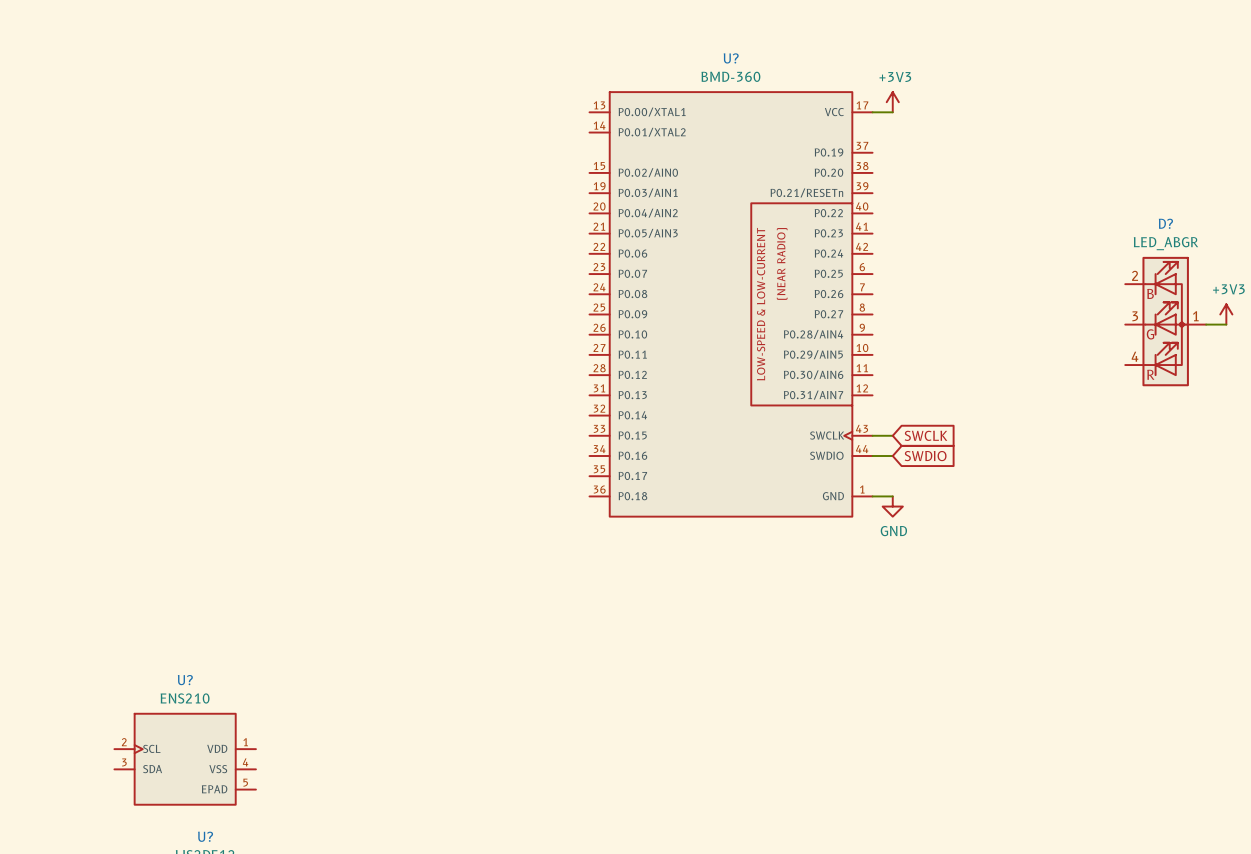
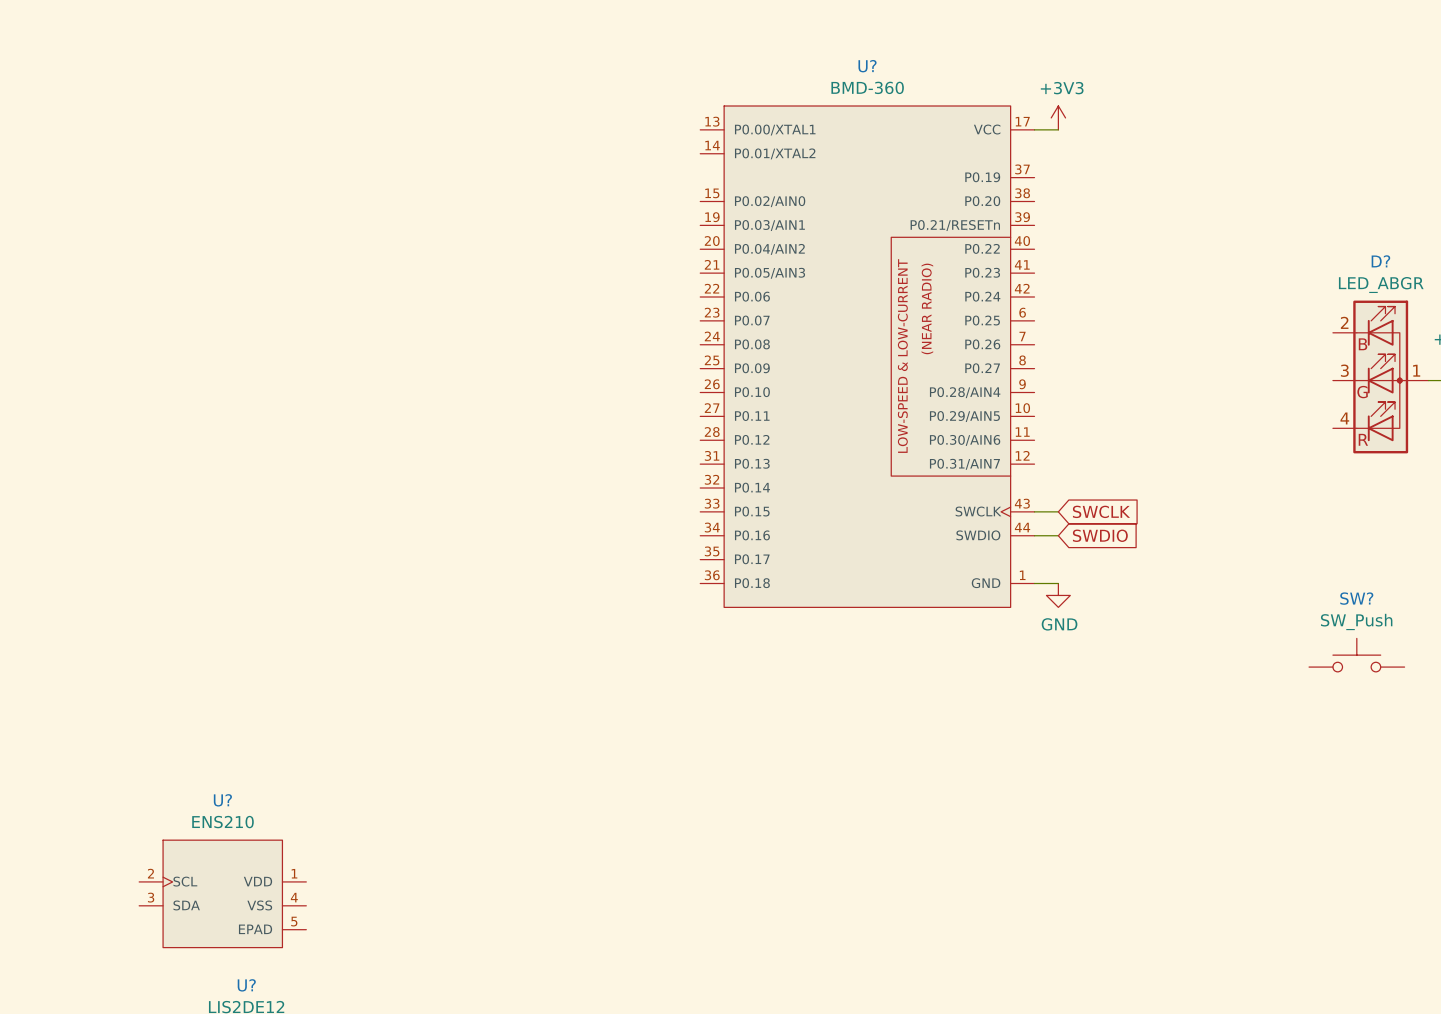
SW?: none -> SW_Push (1356, 655)

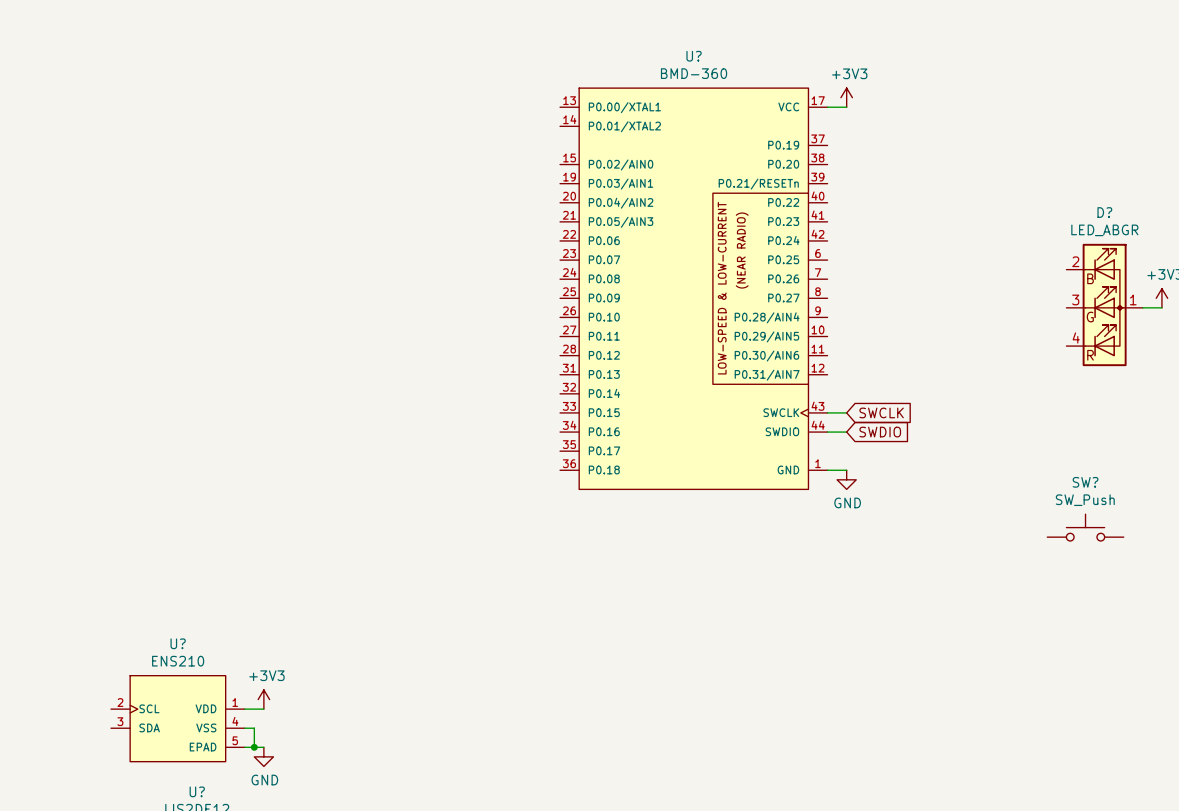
power symbol: none -> +3V3 (263, 699)
wire: none -> (244, 709) (263, 709)
wire: none -> (244, 728) (254, 728) (254, 747)
wire: none -> (244, 747) (263, 747)
junction: none -> (254, 747)
power symbol: none -> GND (263, 756)

